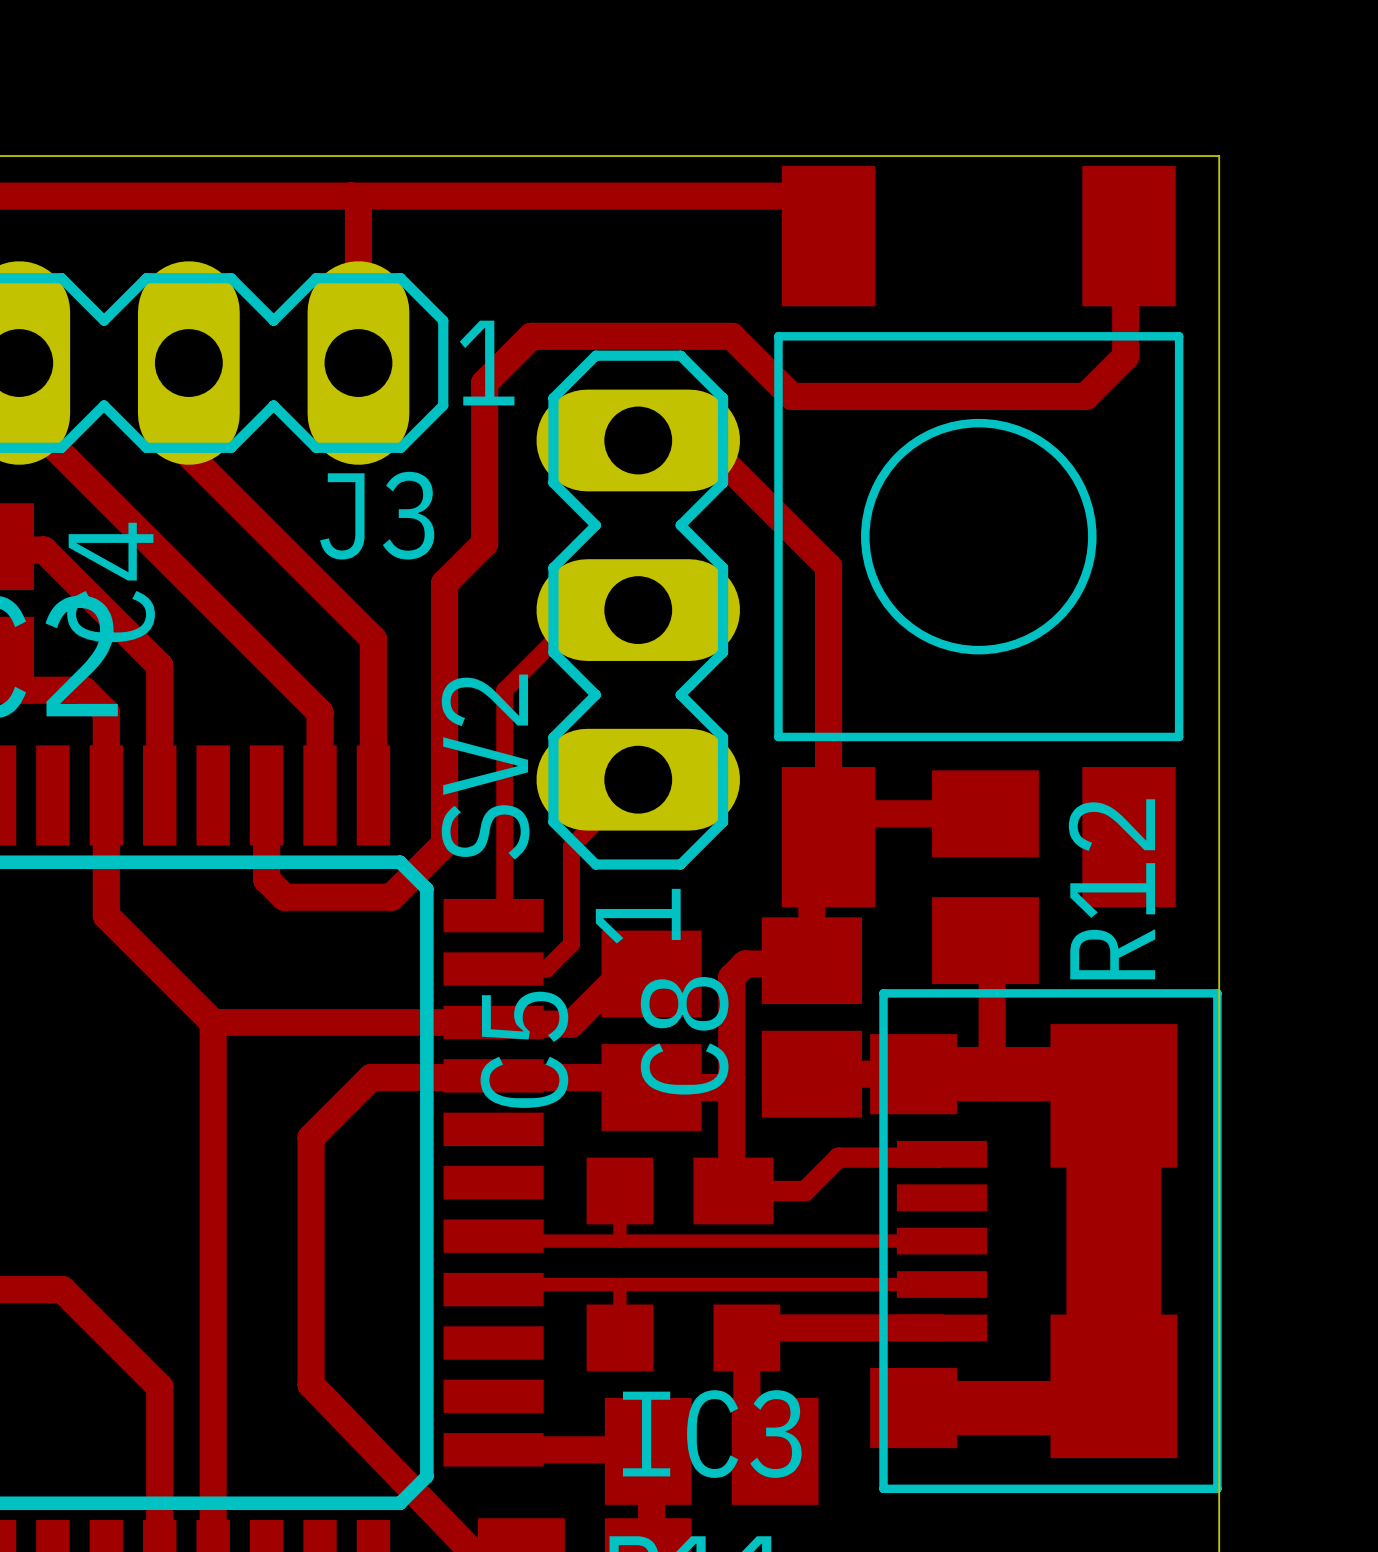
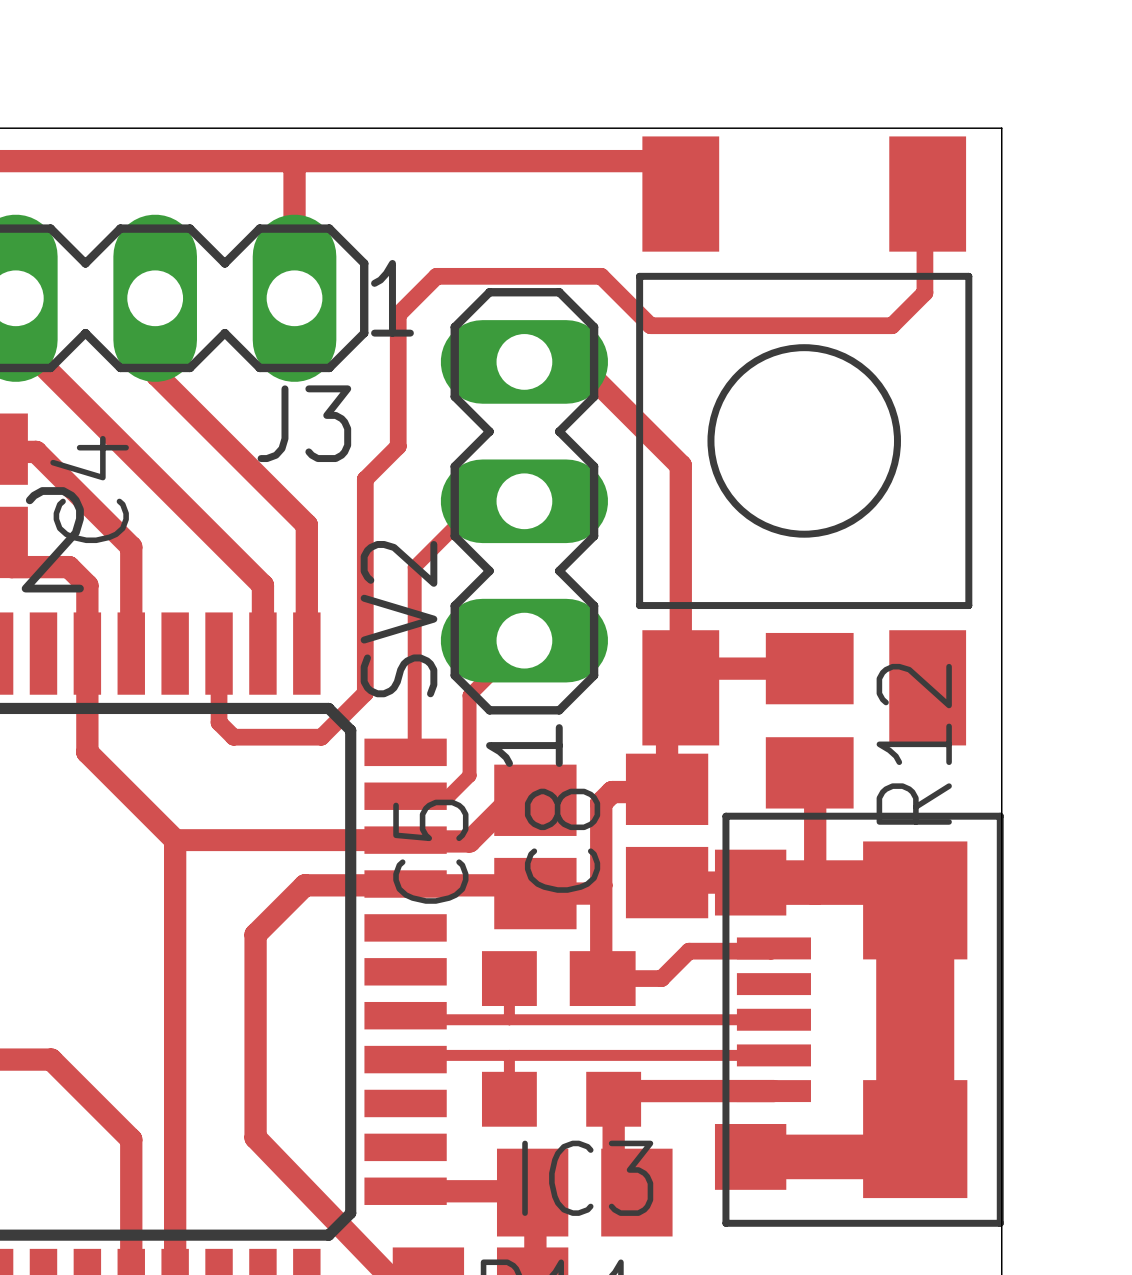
top track width: thick (1125, 239) (1125, 356) (1085, 396) (791, 396) (731, 336) (531, 336) (484, 383) (484, 543) (444, 583) (444, 843) (391, 897) (284, 897) (266, 879) (266, 795) -> thin (924, 196) (924, 292) (892, 325) (650, 325) (601, 276) (436, 276) (398, 314) (398, 446) (365, 479) (365, 693) (321, 737) (233, 737) (219, 722) (219, 653)

